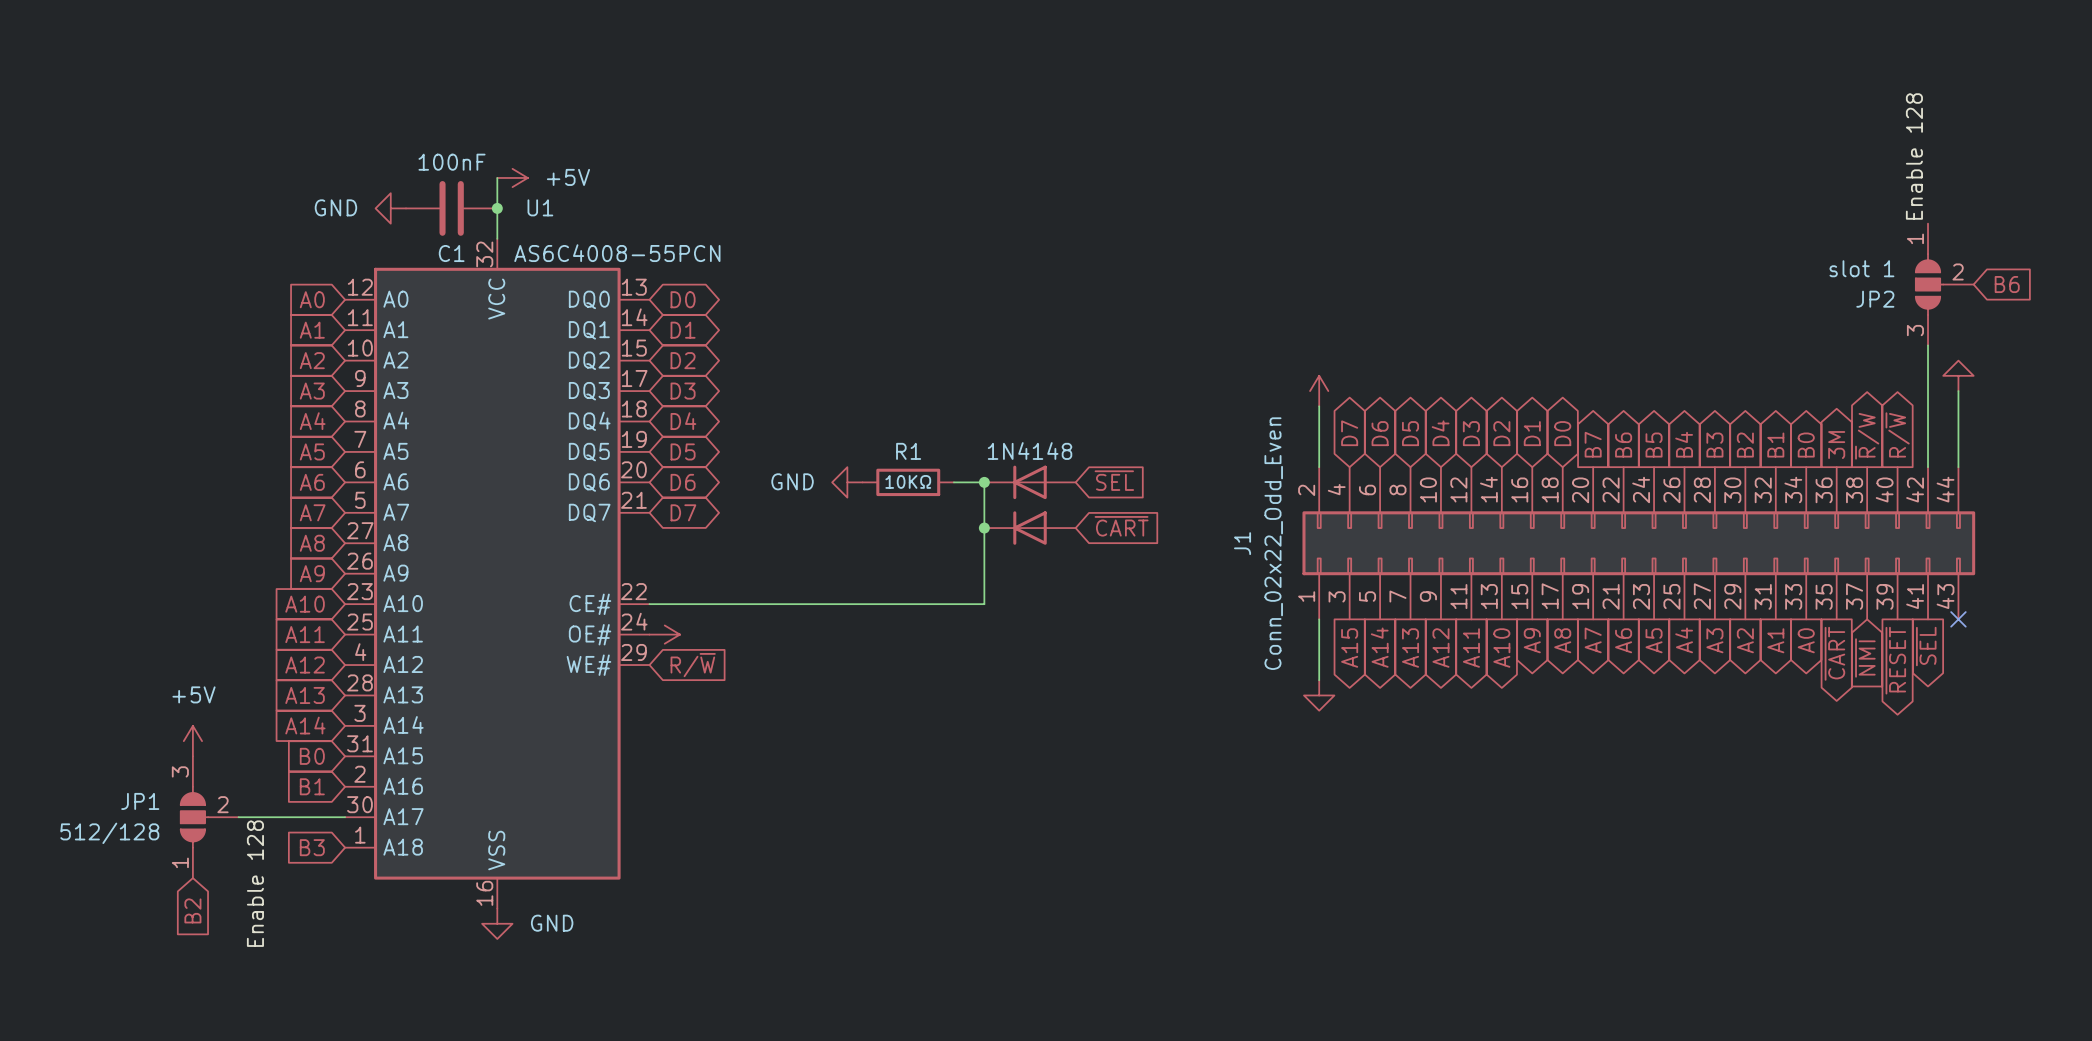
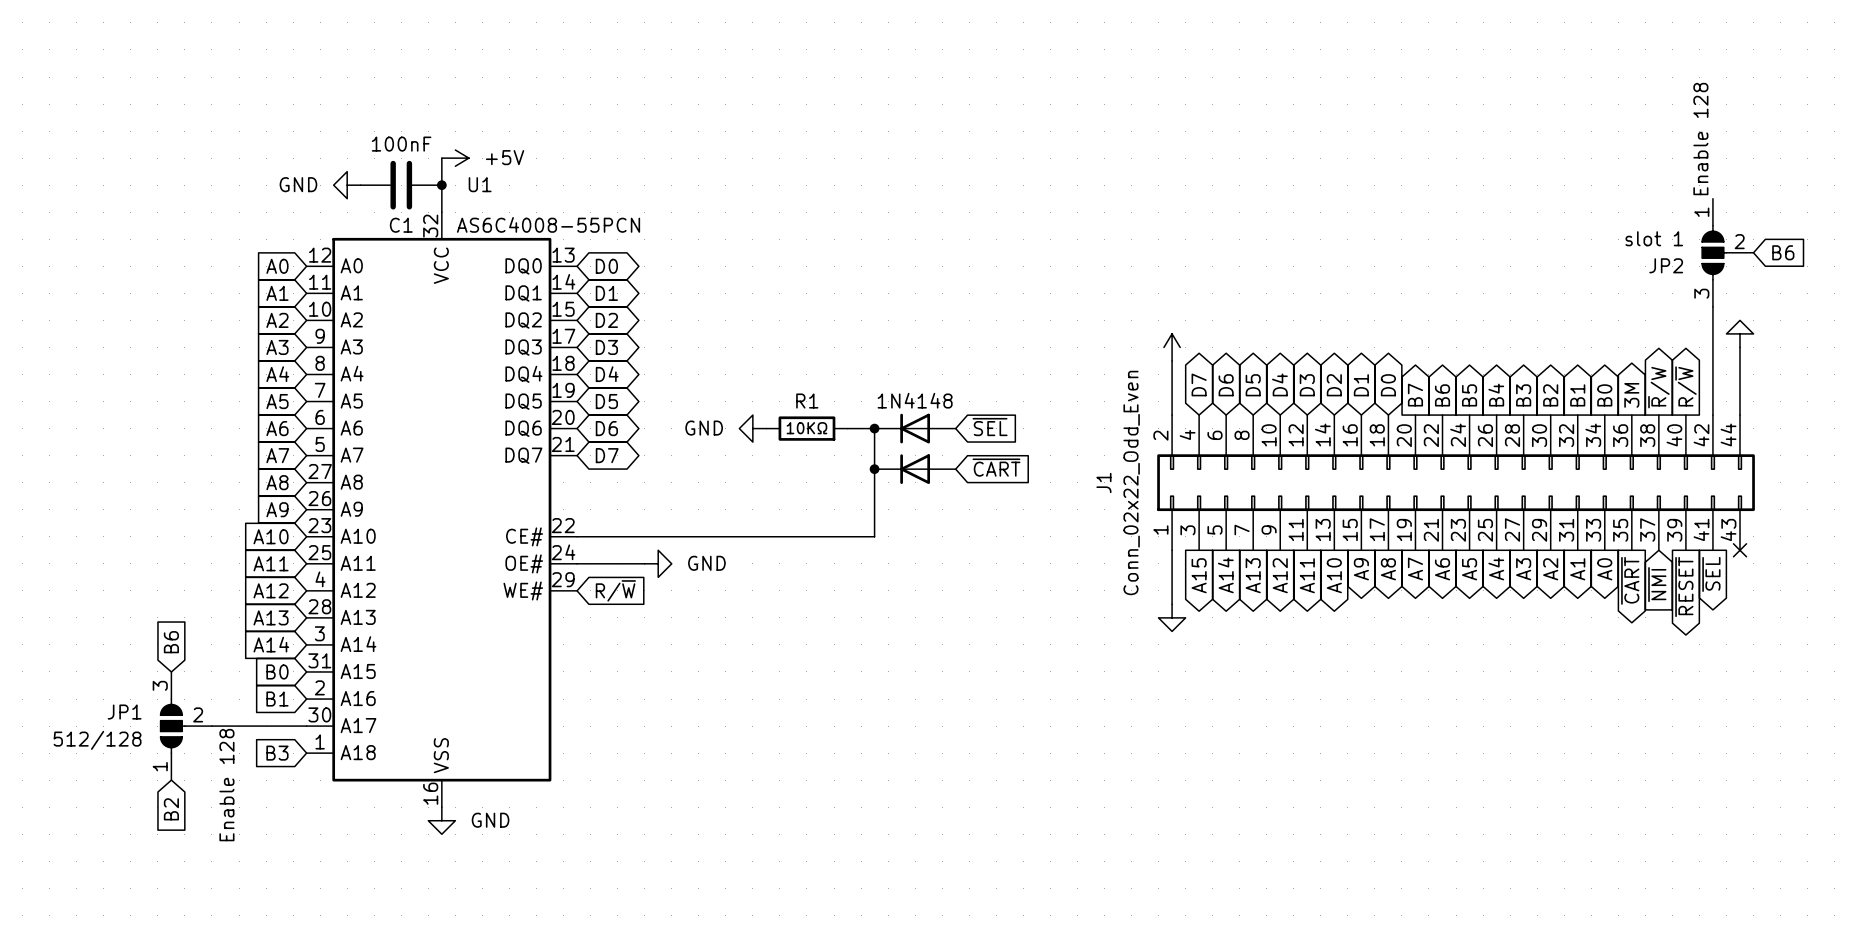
wire: none -> (577, 563) (644, 563)
power symbol: (664, 634) -> none
power symbol: none -> GND (658, 563)
global label: none -> B6 (171, 642)
power symbol: +5V (192, 741) -> none

